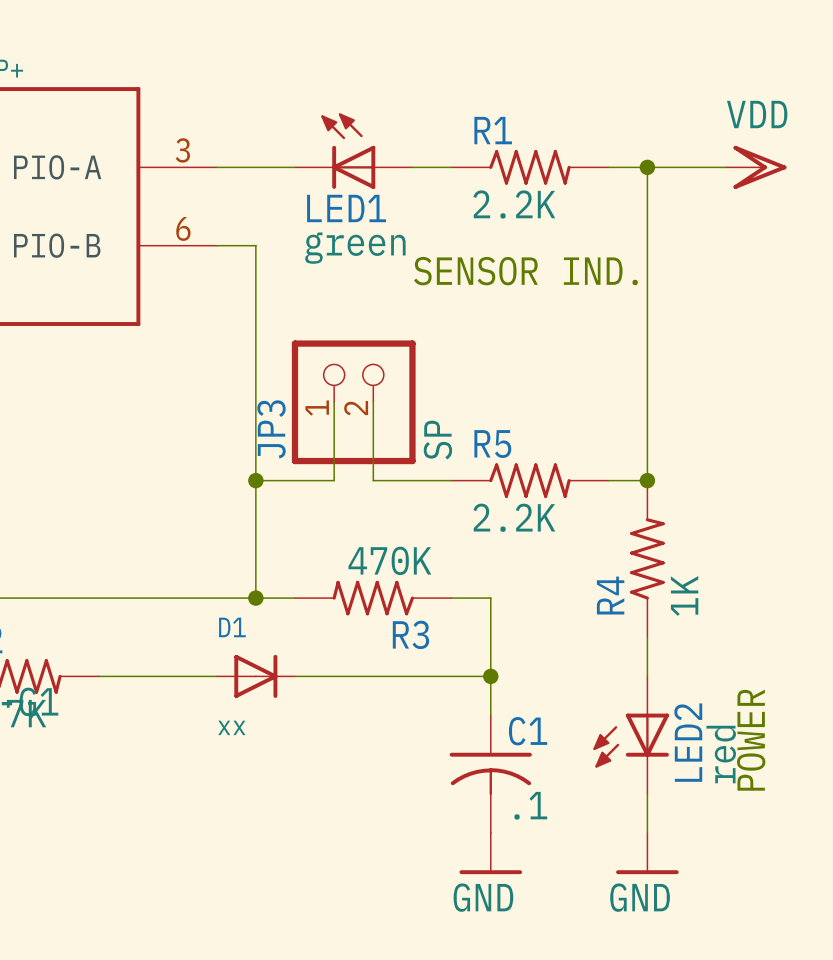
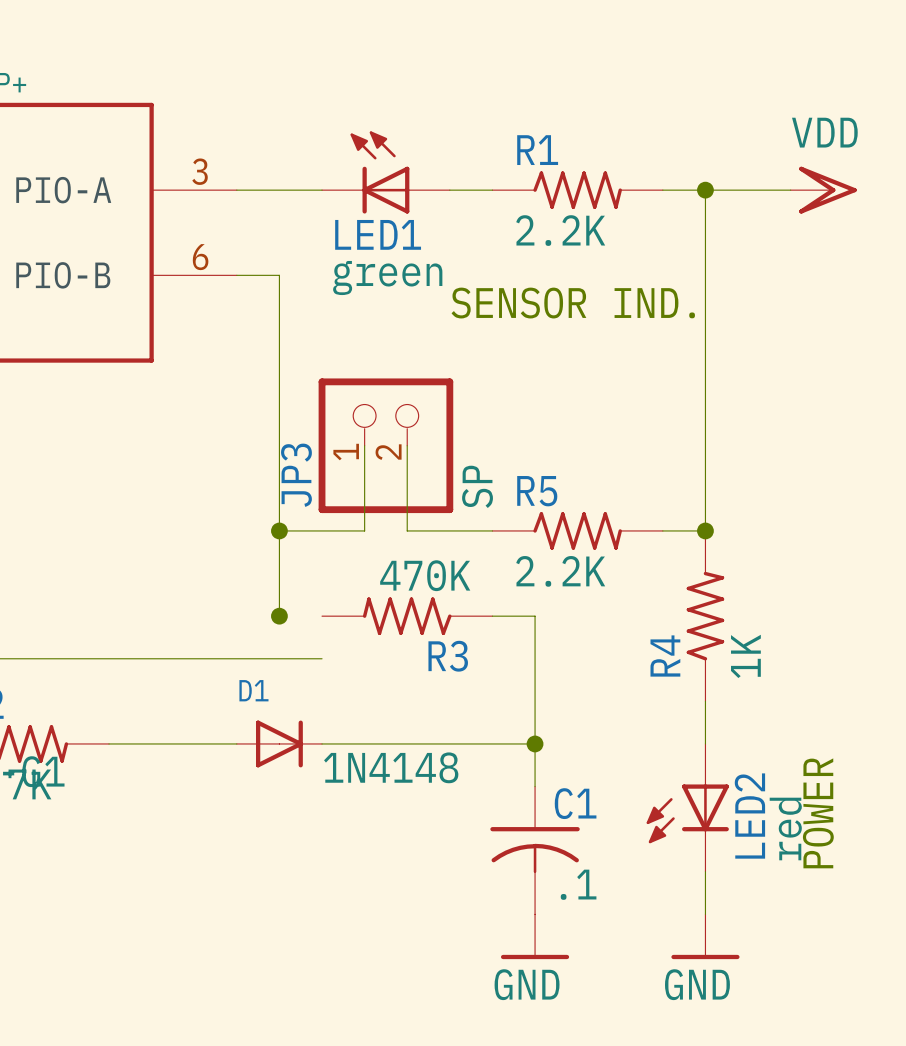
wire: (255, 558) (255, 598) -> none
junction position: (255, 598) -> (279, 616)
R3 position: (373, 598) -> (407, 616)
wire: (451, 598) (490, 598) -> (492, 616) (535, 616) (535, 658)
D1 value: xx (231, 727) -> 1N4148 (391, 767)

